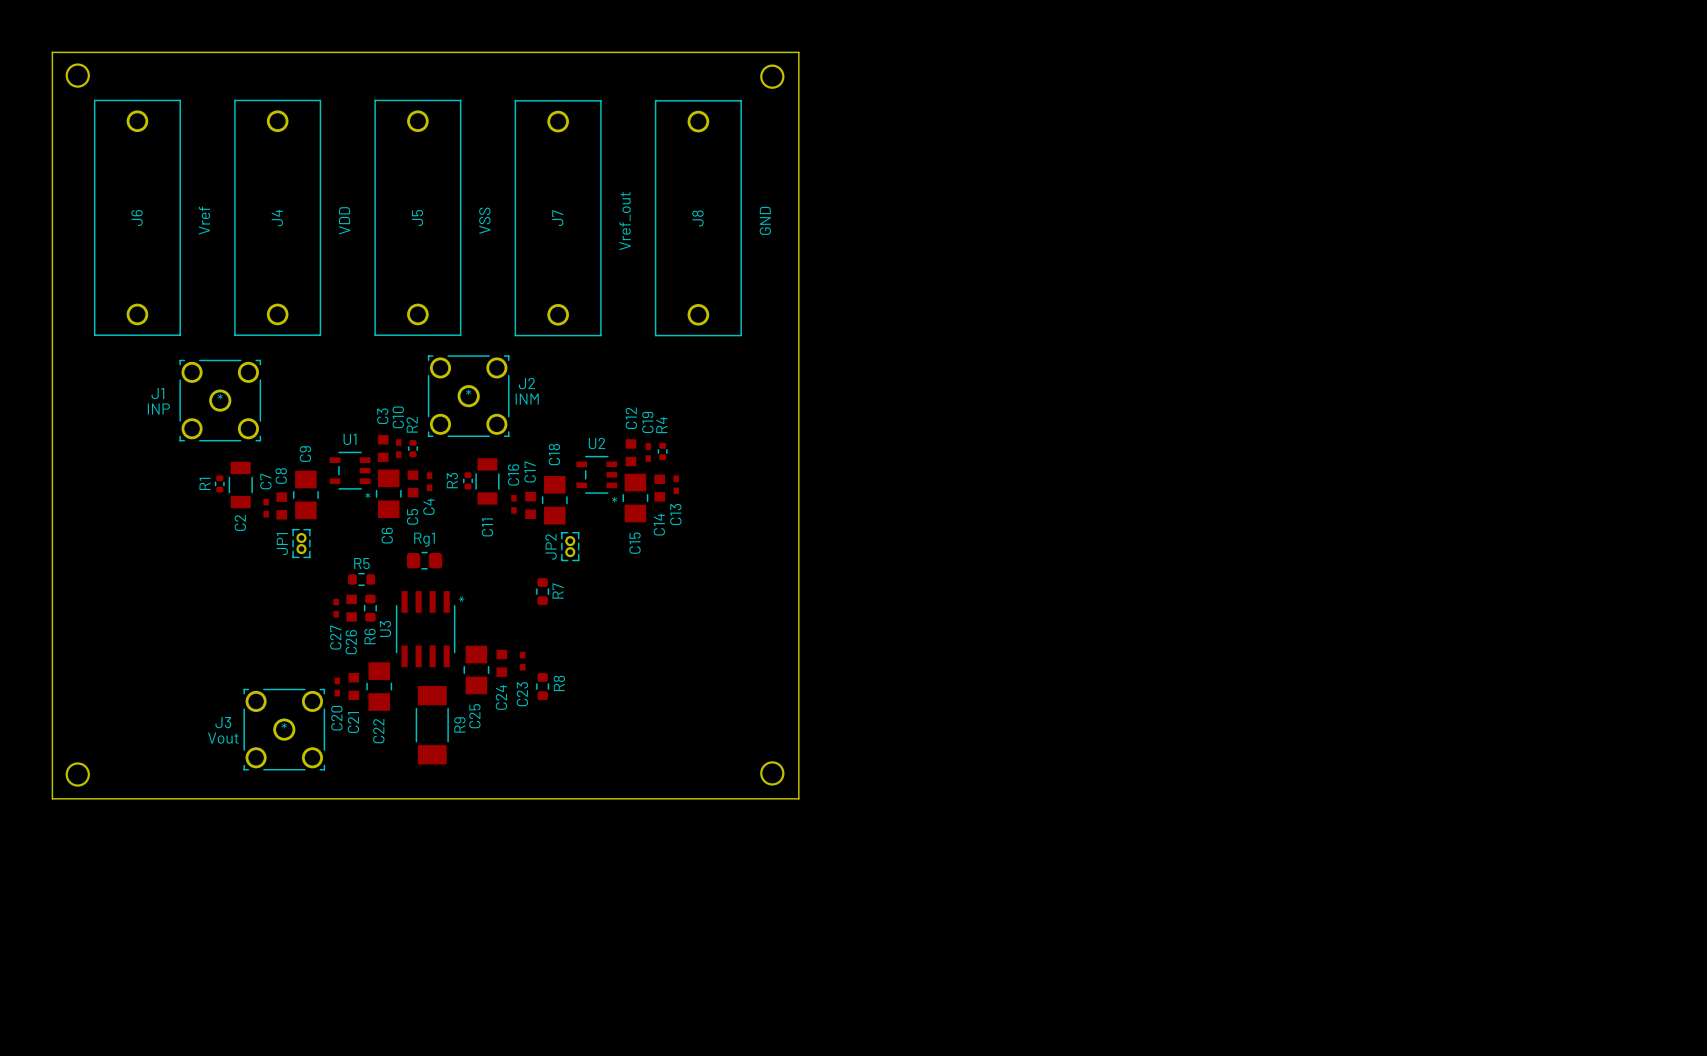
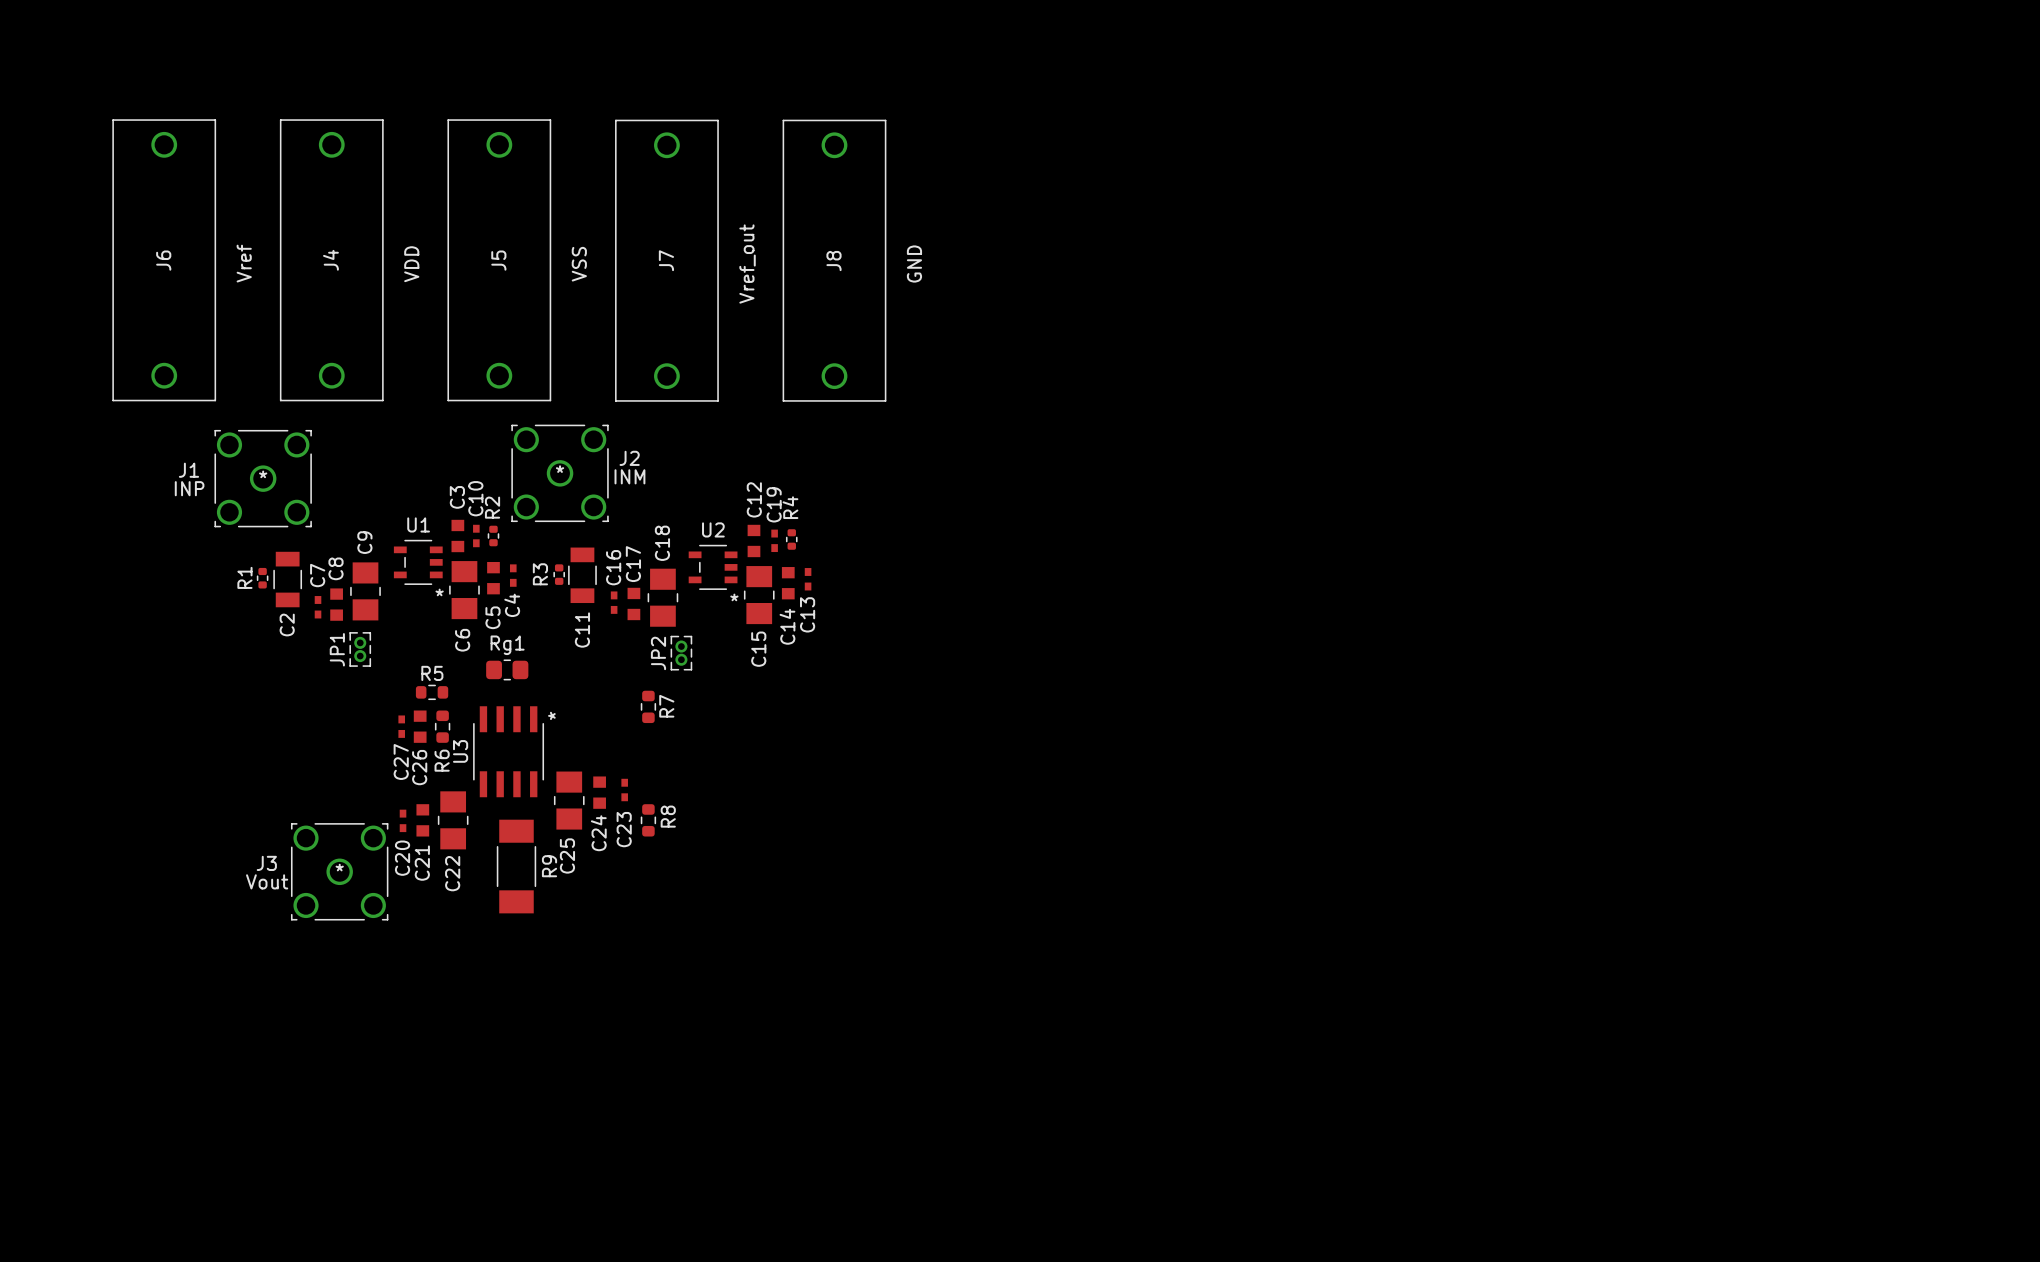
board edge: (52, 52) (798, 52) (798, 798) (52, 798) (52, 52) -> none
round board edge: [65, 63, 90, 88] -> none
round board edge: [760, 64, 785, 89] -> none
round board edge: [760, 761, 785, 786] -> none
round board edge: [65, 762, 90, 787] -> none

